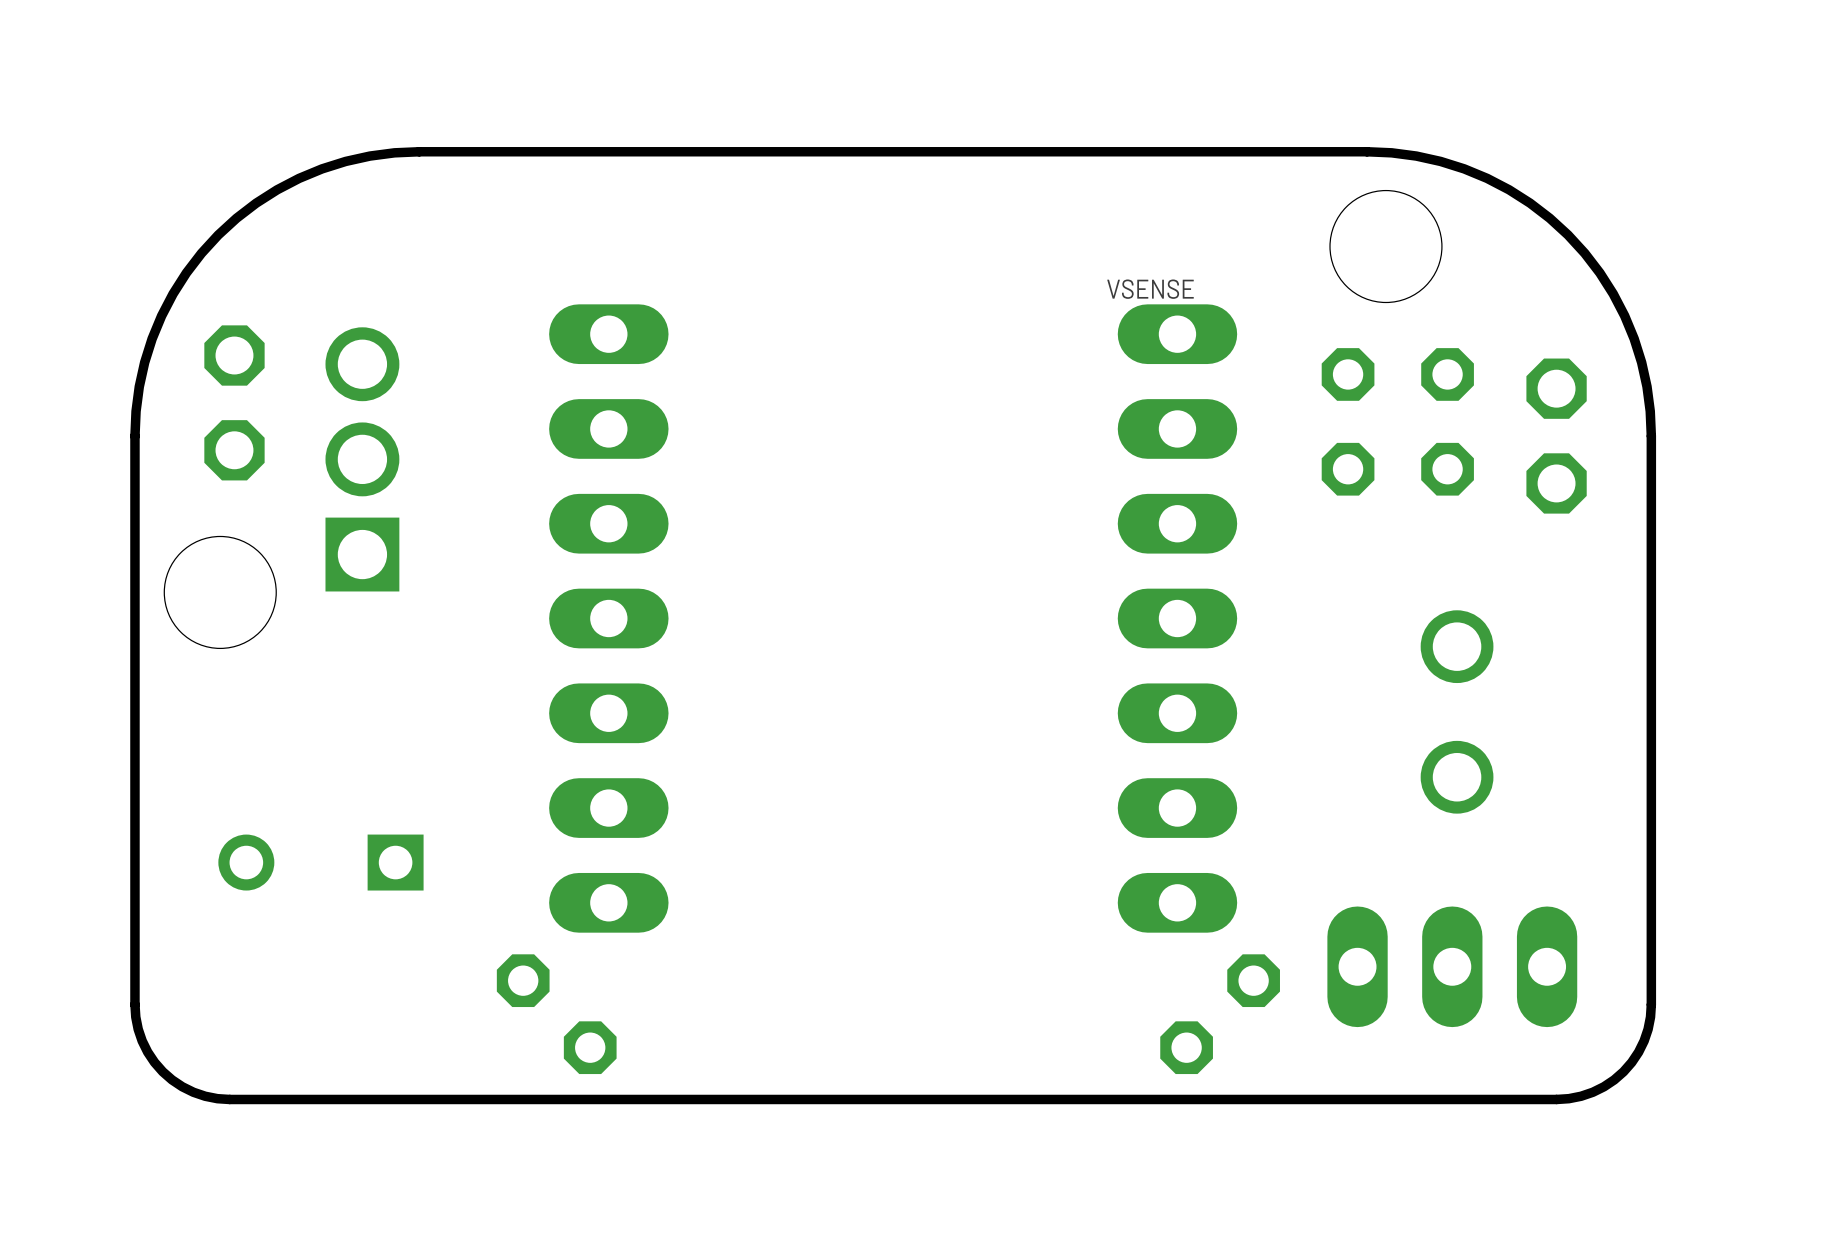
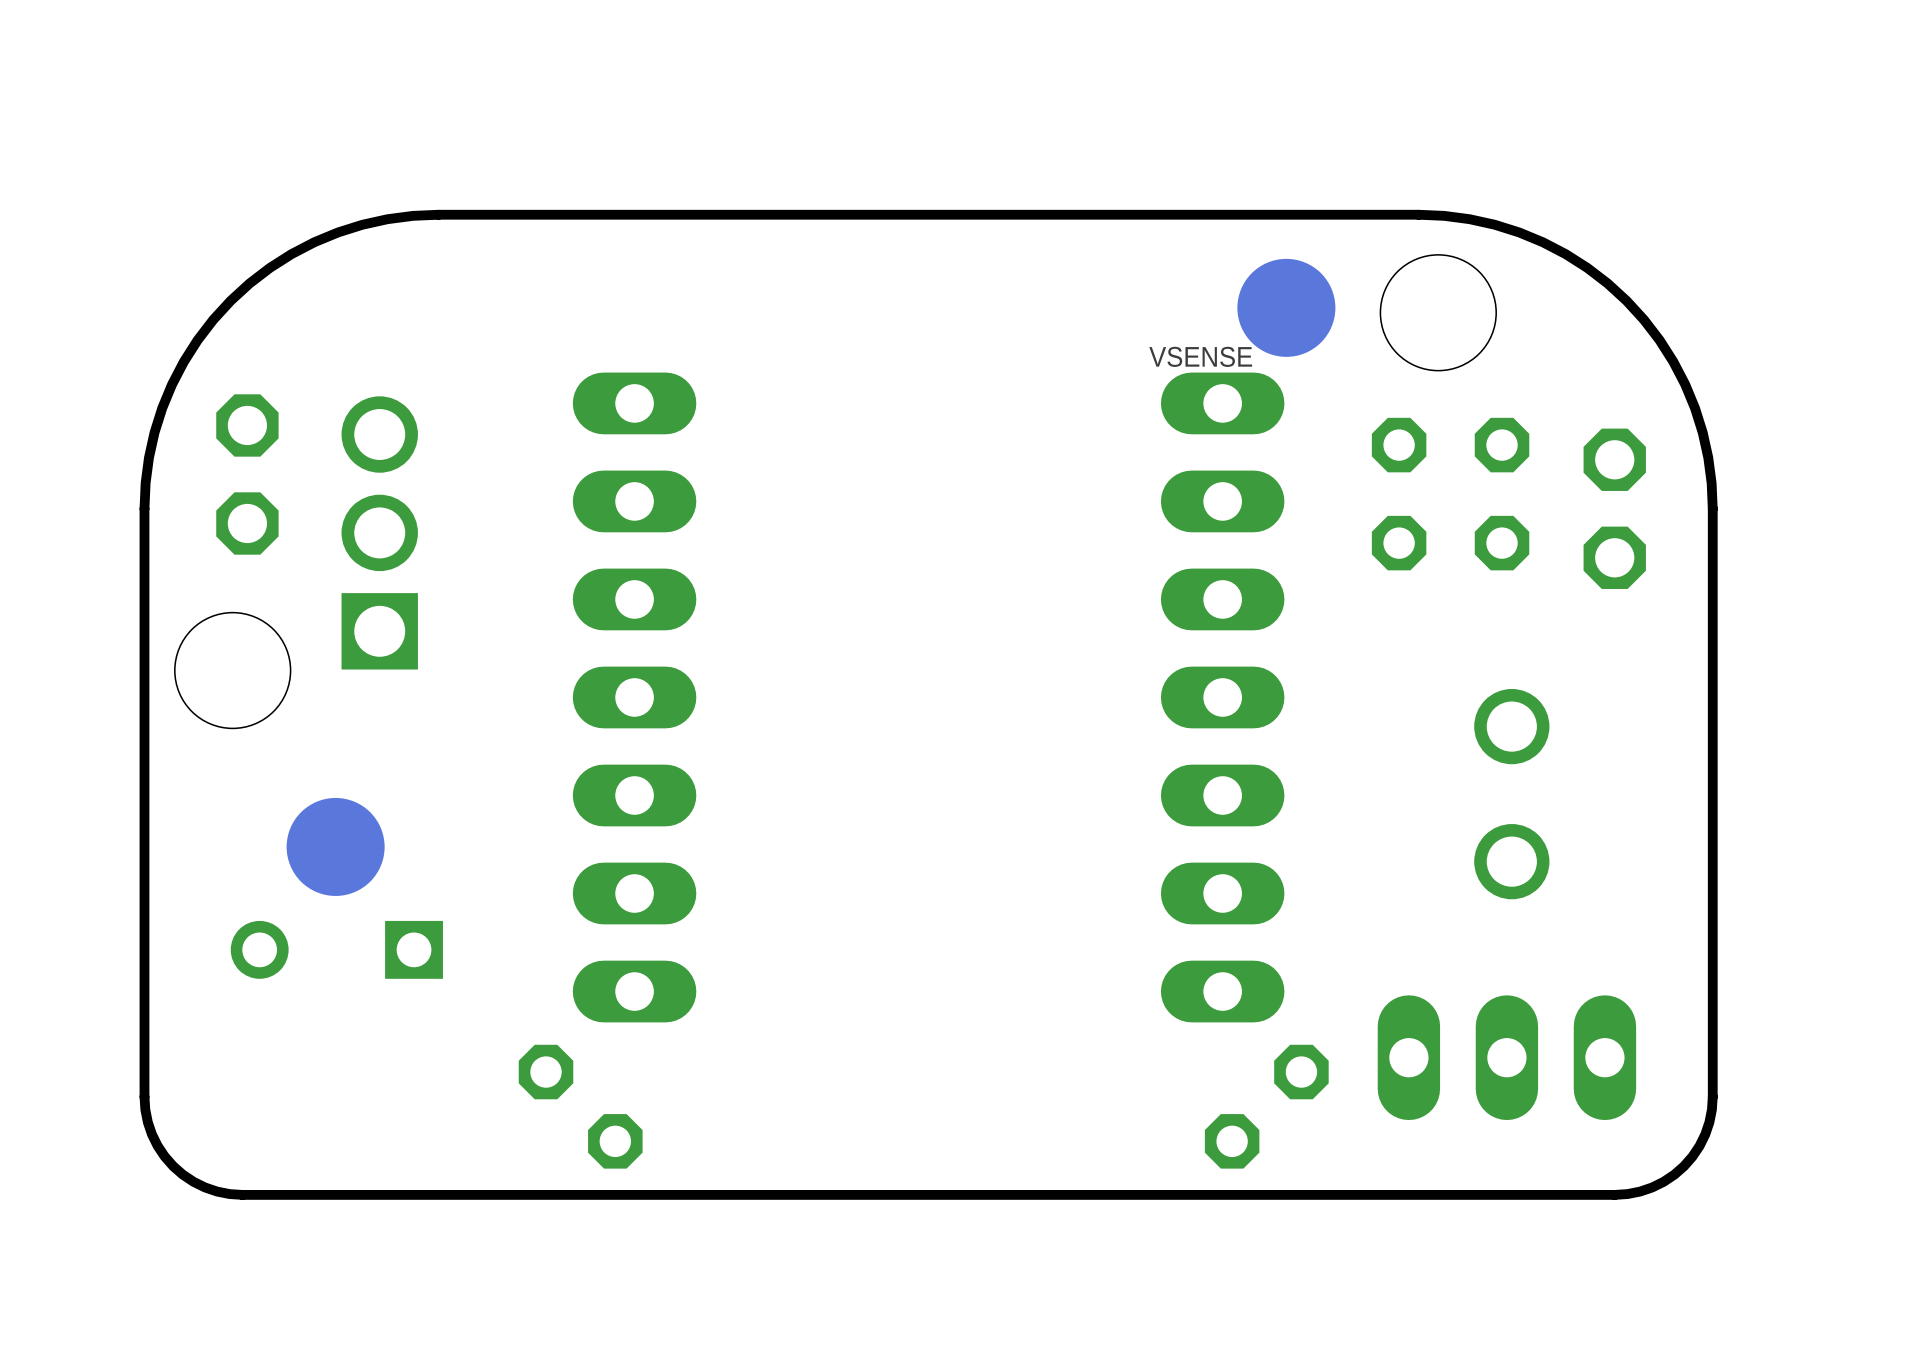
part: none -> (1286, 307)
part: none -> (335, 846)

